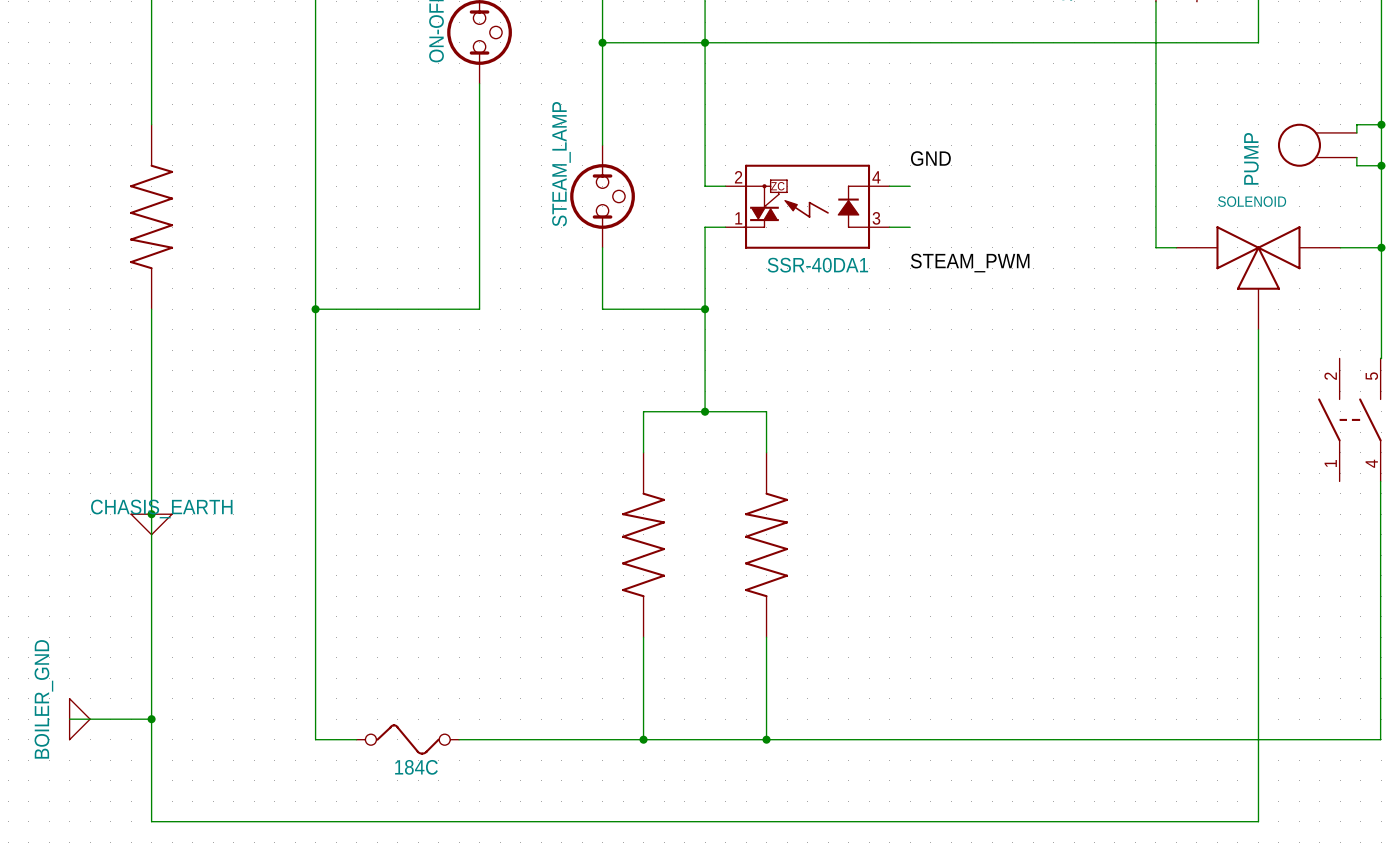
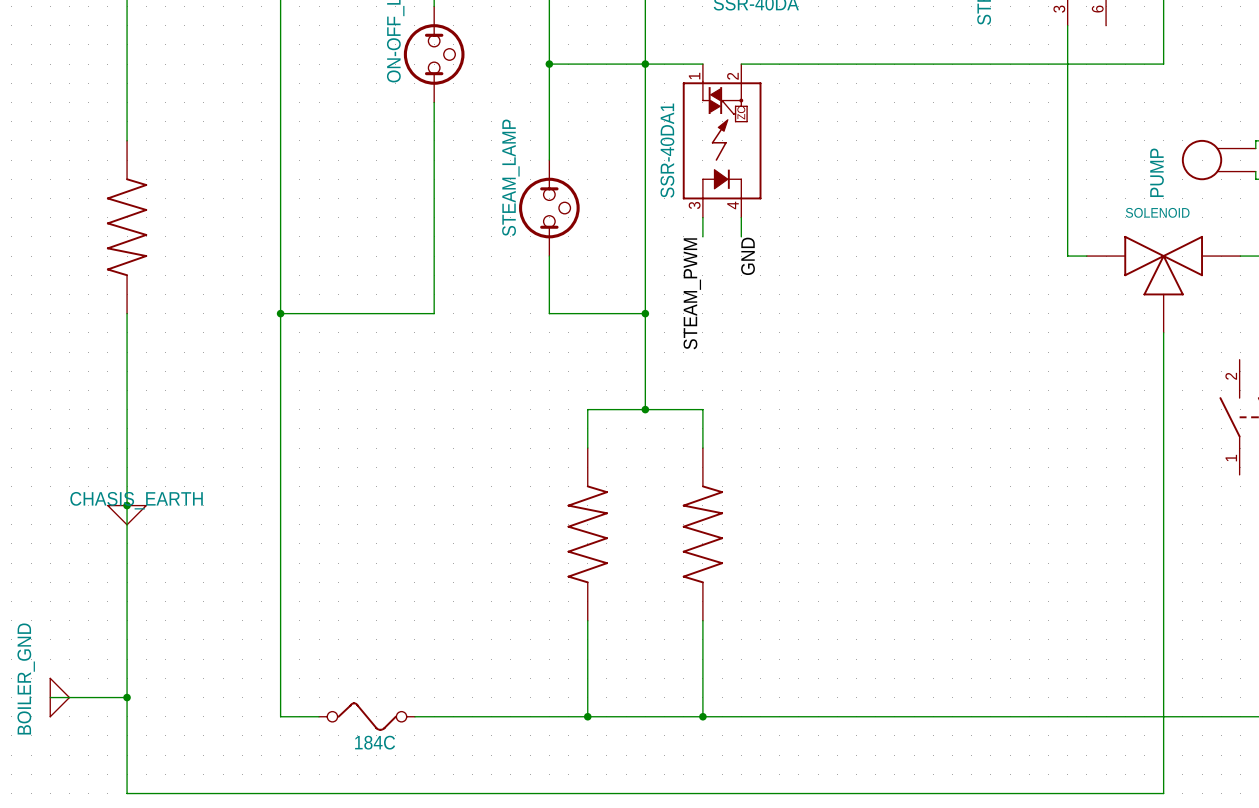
wire: (766, 42) (807, 42) -> none
label rotation: 0° (930, 158) -> 90° counterclockwise (748, 256)
label position: GND (930, 158) -> GND (748, 256)
SSR-40DA1 symbol: [725, 164, 890, 249] -> [682, 64, 762, 218]
wire: (705, 186) (725, 186) -> (645, 198) (645, 236)
wire: (889, 186) (910, 186) -> none
wire: none -> (702, 217) (702, 236)
wire: none -> (741, 217) (741, 236)
wire: (705, 227) (725, 227) -> none
wire: (889, 227) (910, 227) -> none
label rotation: 0° (970, 263) -> 90° counterclockwise (692, 293)
label position: STEAM_PWM (970, 263) -> STEAM_PWM (692, 293)
SSR-40DA1 name position: SSR-40DA1 (817, 265) -> SSR-40DA1 (667, 150)

